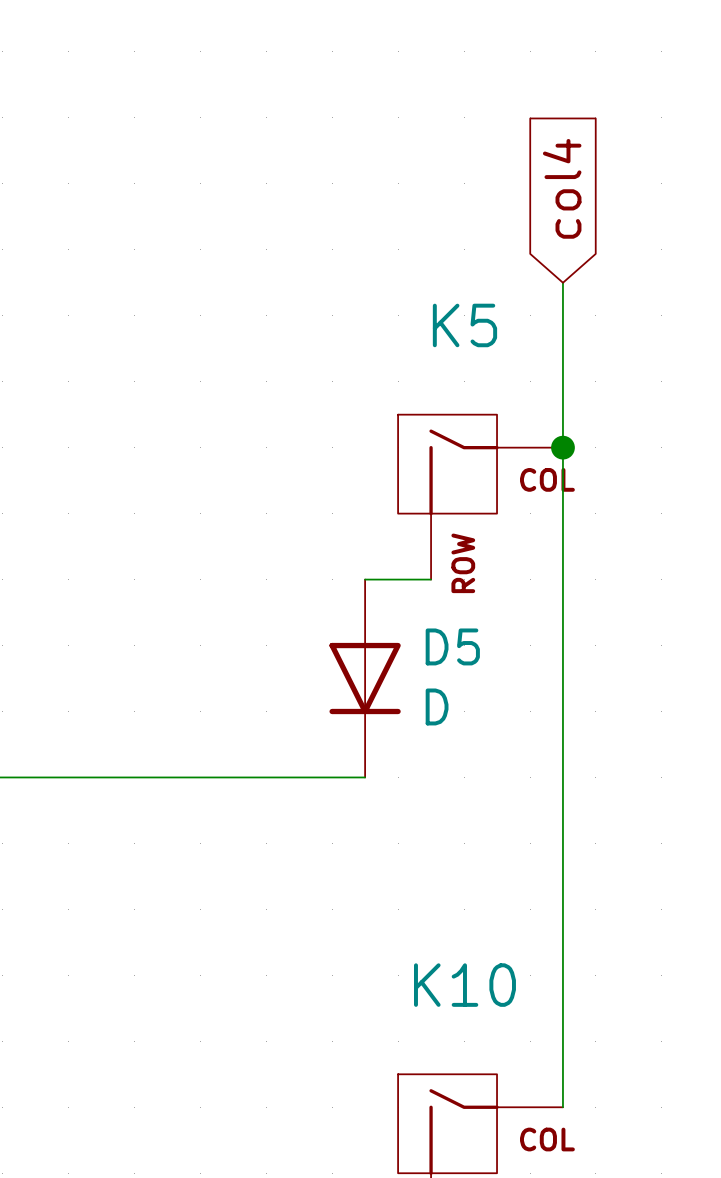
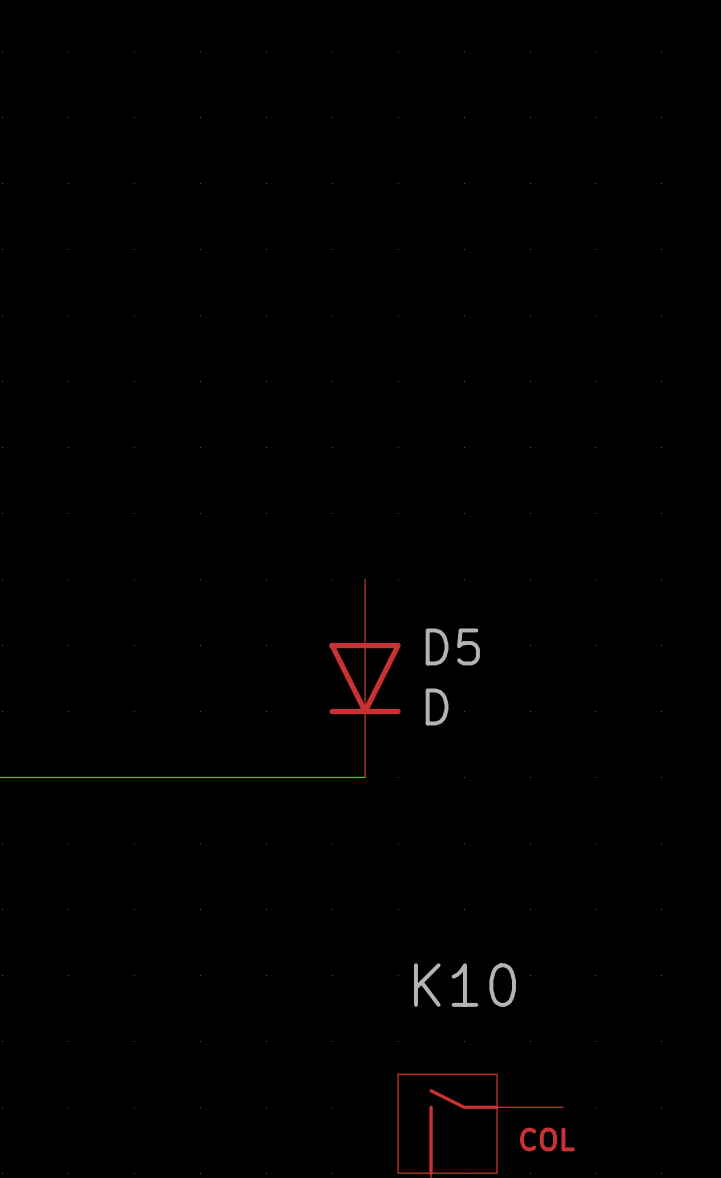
global label: col4 (562, 188) -> none
wire: (562, 282) (562, 1107) -> none
junction: (562, 447) -> none
K5: (480, 497) -> none
wire: (365, 579) (431, 579) -> none

